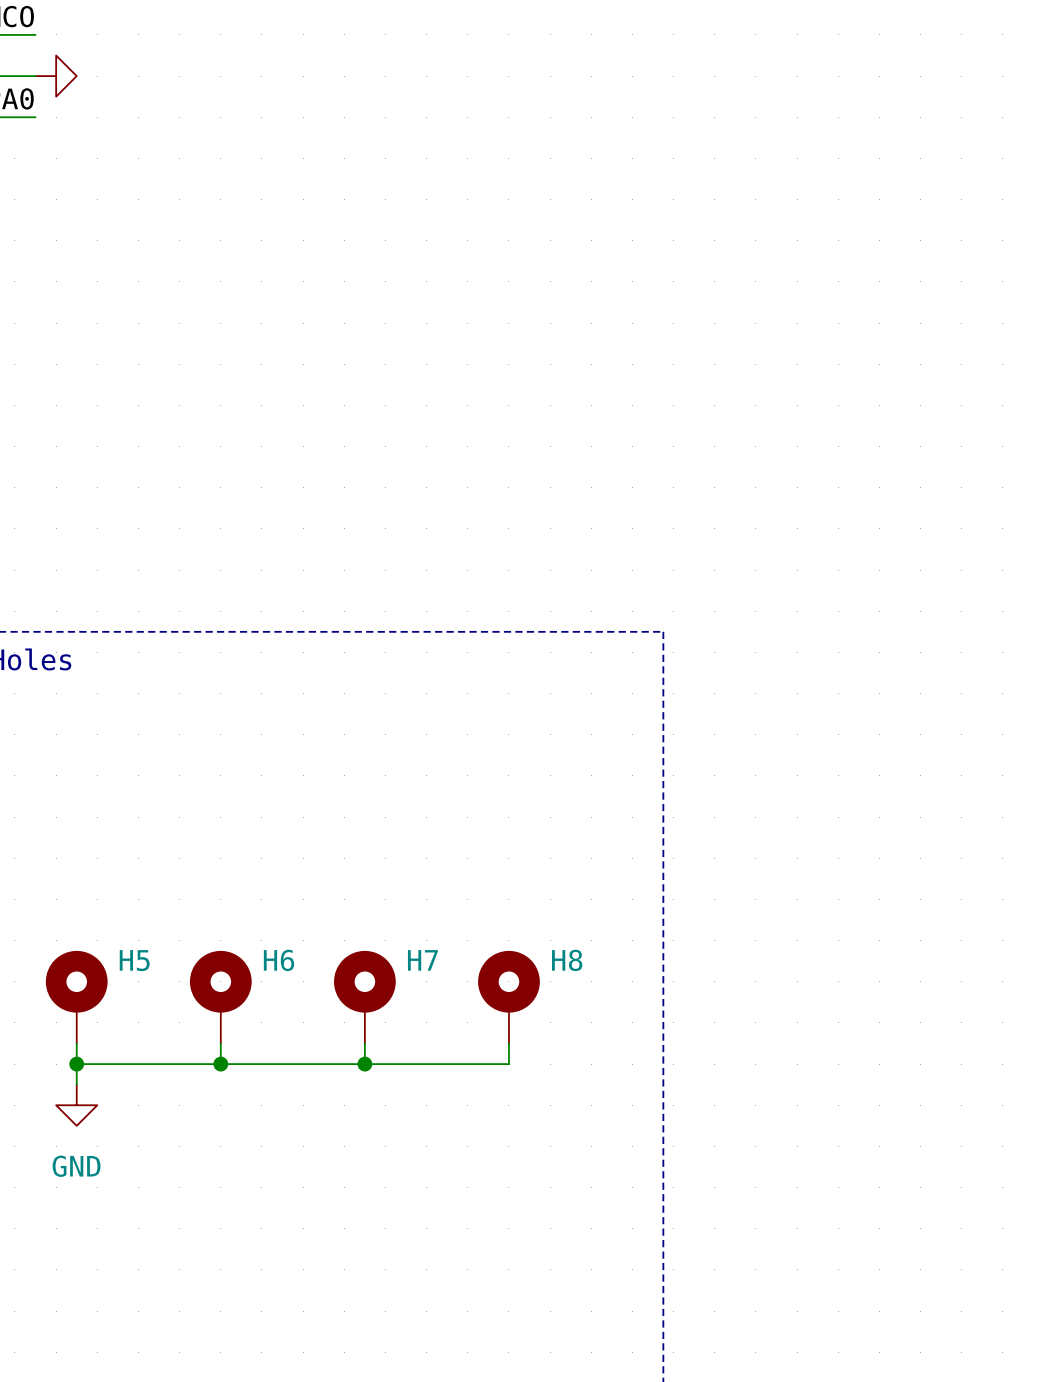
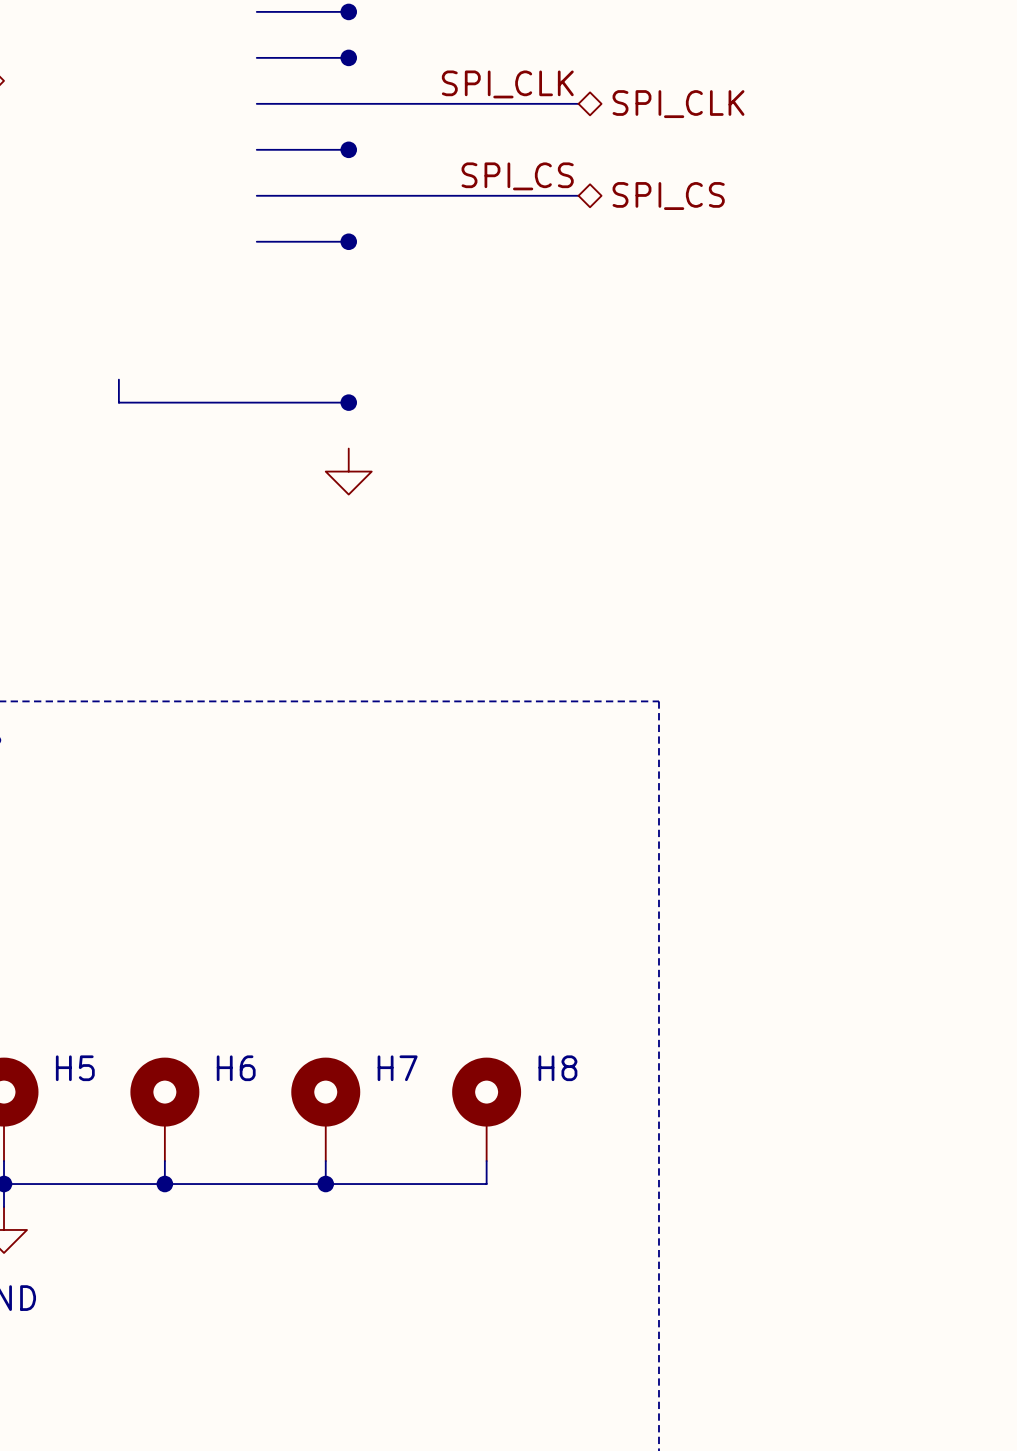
wire: none -> (256, 11) (348, 11)
junction: none -> (348, 11)
wire: none -> (256, 57) (348, 57)
junction: none -> (348, 57)
label: none -> SPI_CLK (507, 84)
wire: none -> (256, 103) (578, 103)
hierarchical label: none -> SPI_CLK (678, 104)
wire: none -> (256, 149) (348, 149)
junction: none -> (348, 149)
label: none -> SPI_CS (517, 176)
wire: none -> (256, 195) (578, 195)
hierarchical label: none -> SPI_CS (668, 196)
wire: none -> (256, 241) (348, 241)
junction: none -> (348, 241)
wire: none -> (118, 379) (118, 402) (348, 402)
junction: none -> (348, 402)
power symbol: none -> (348, 471)

